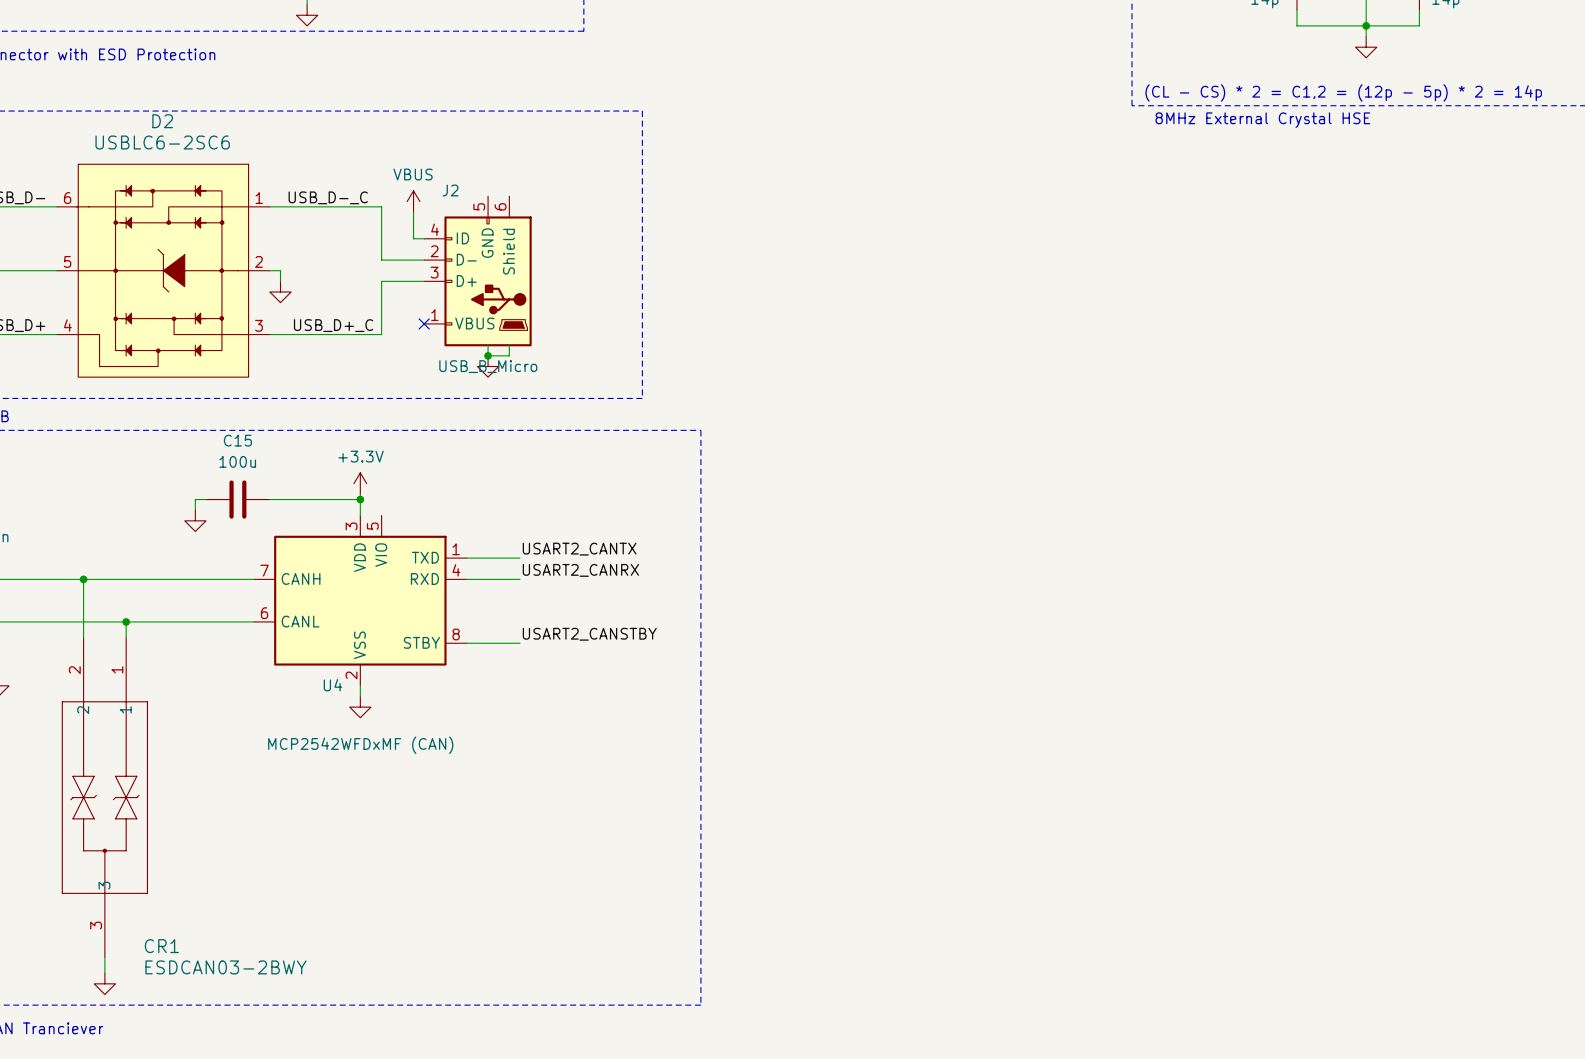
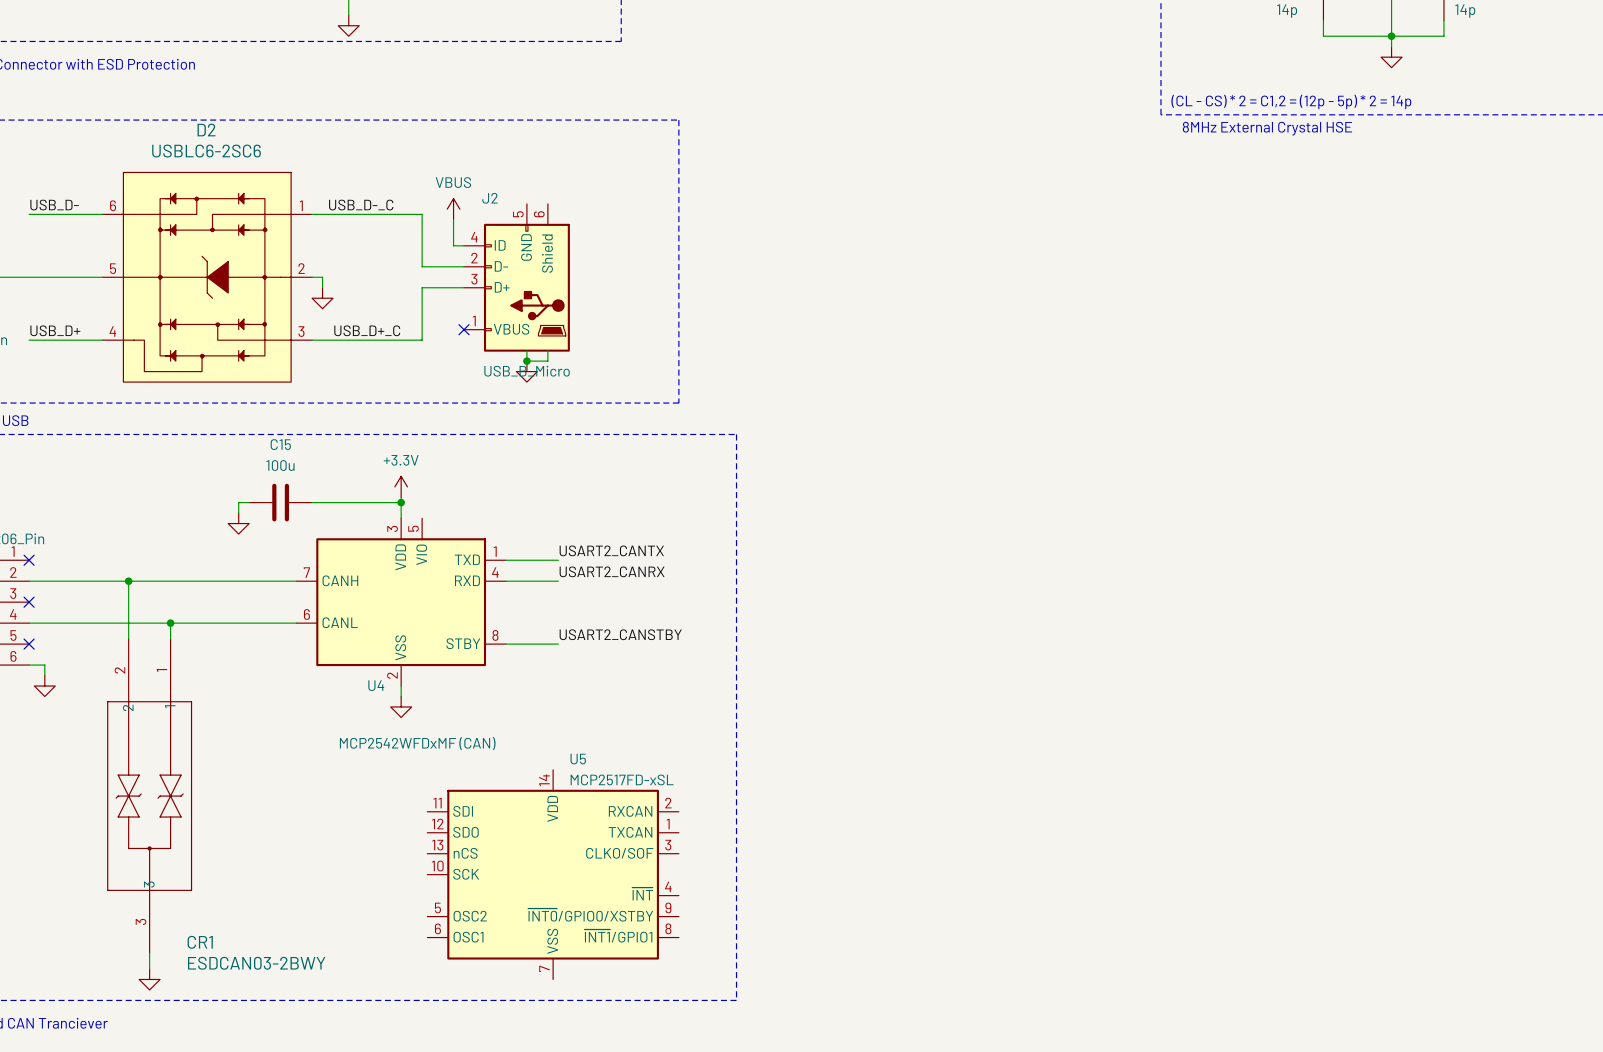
U5: none -> MCP2517FD-xSL (553, 874)

